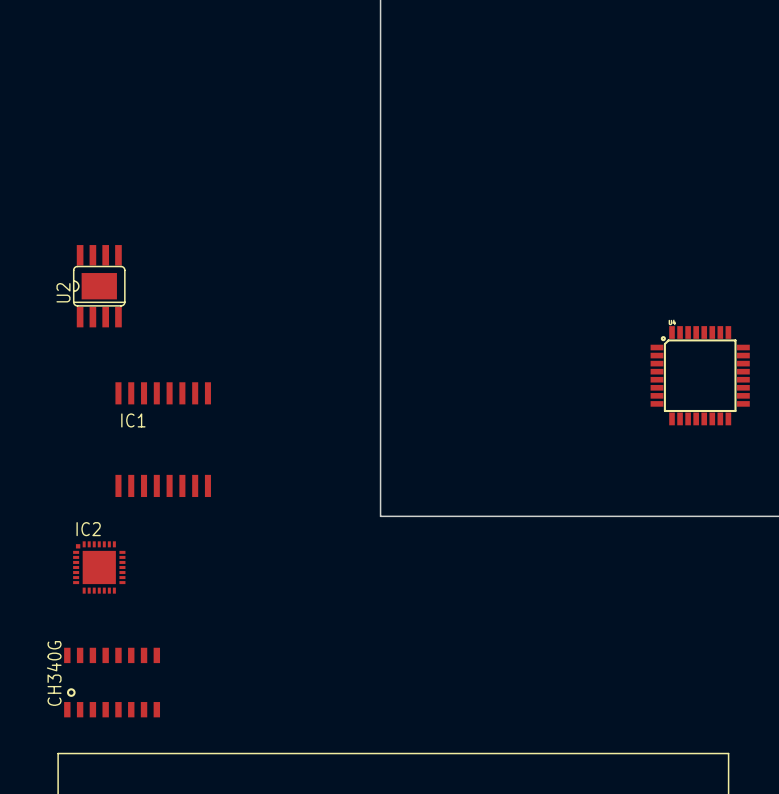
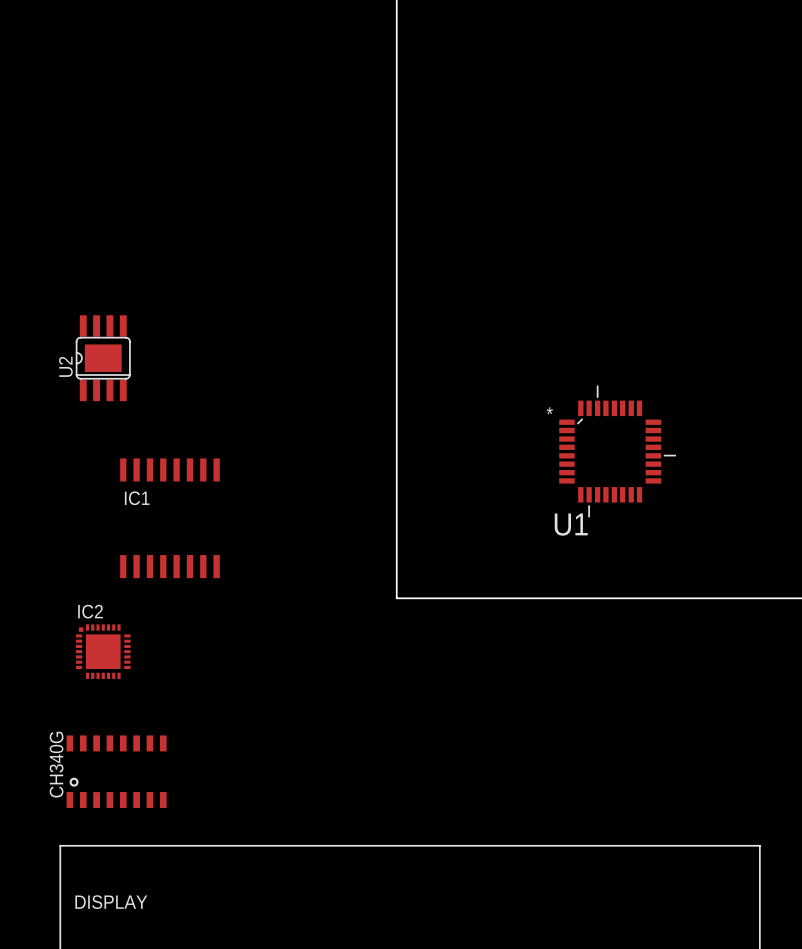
U1: none -> (617, 451)
part: (700, 375) -> none

